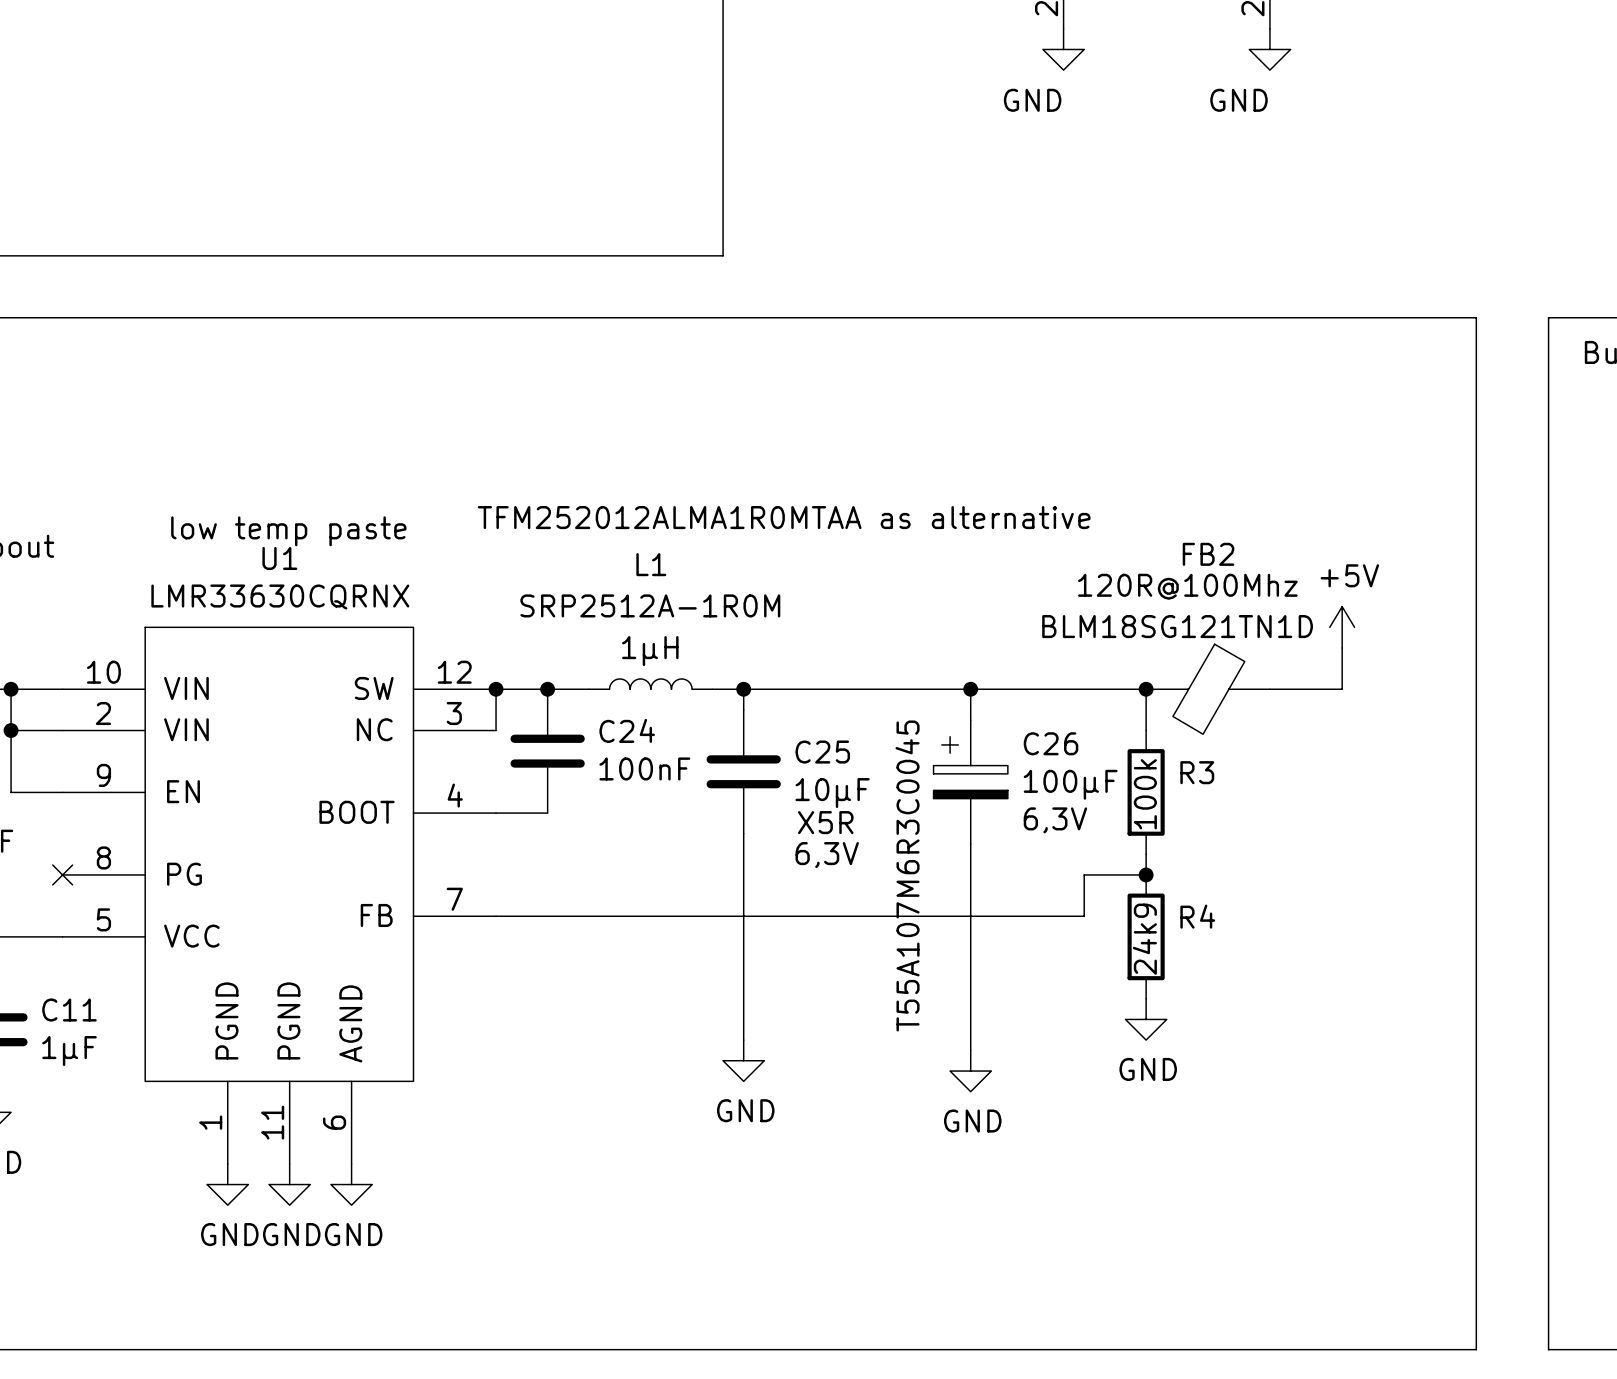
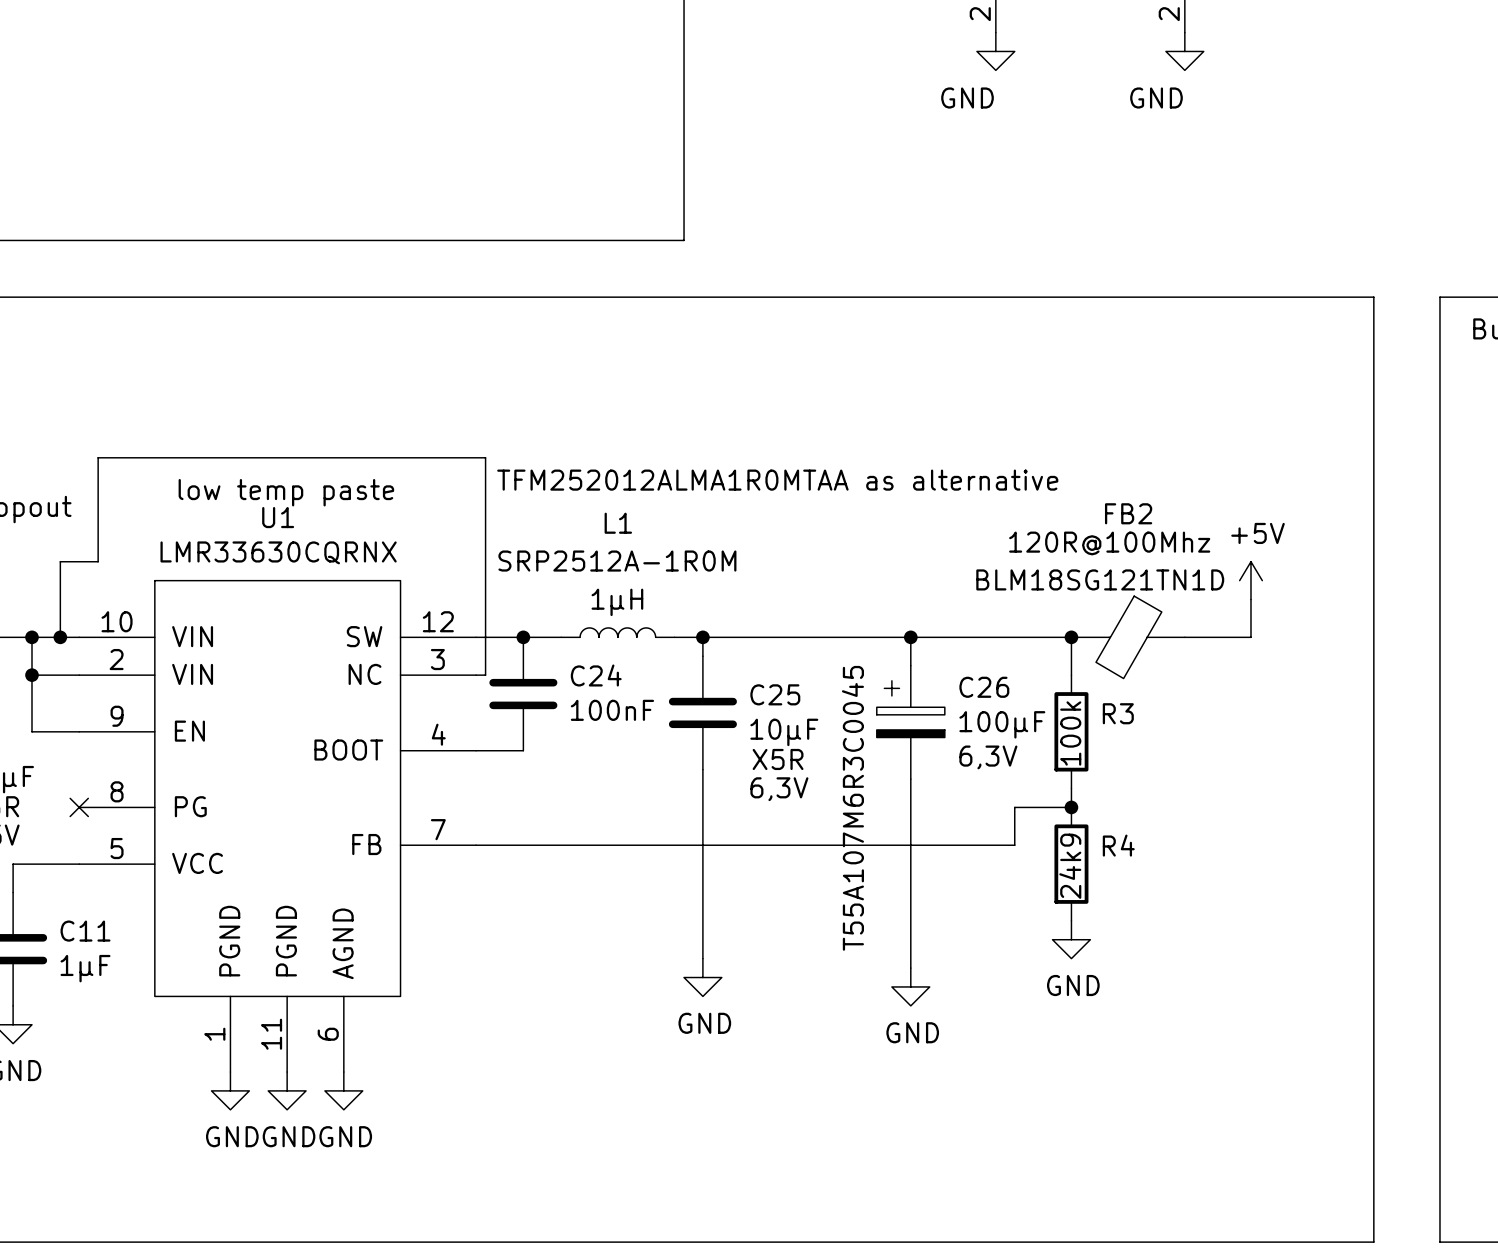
text position: TFM252012ALMA1R0MTAA as alternative (784, 517) -> TFM252012ALMA1R0MTAA as alternative (777, 480)
junction: none -> (60, 637)
wire: (496, 689) (496, 730) -> (60, 637) (60, 561) (98, 561) (98, 457) (485, 457) (485, 675) (476, 675)
junction: (496, 689) -> none

